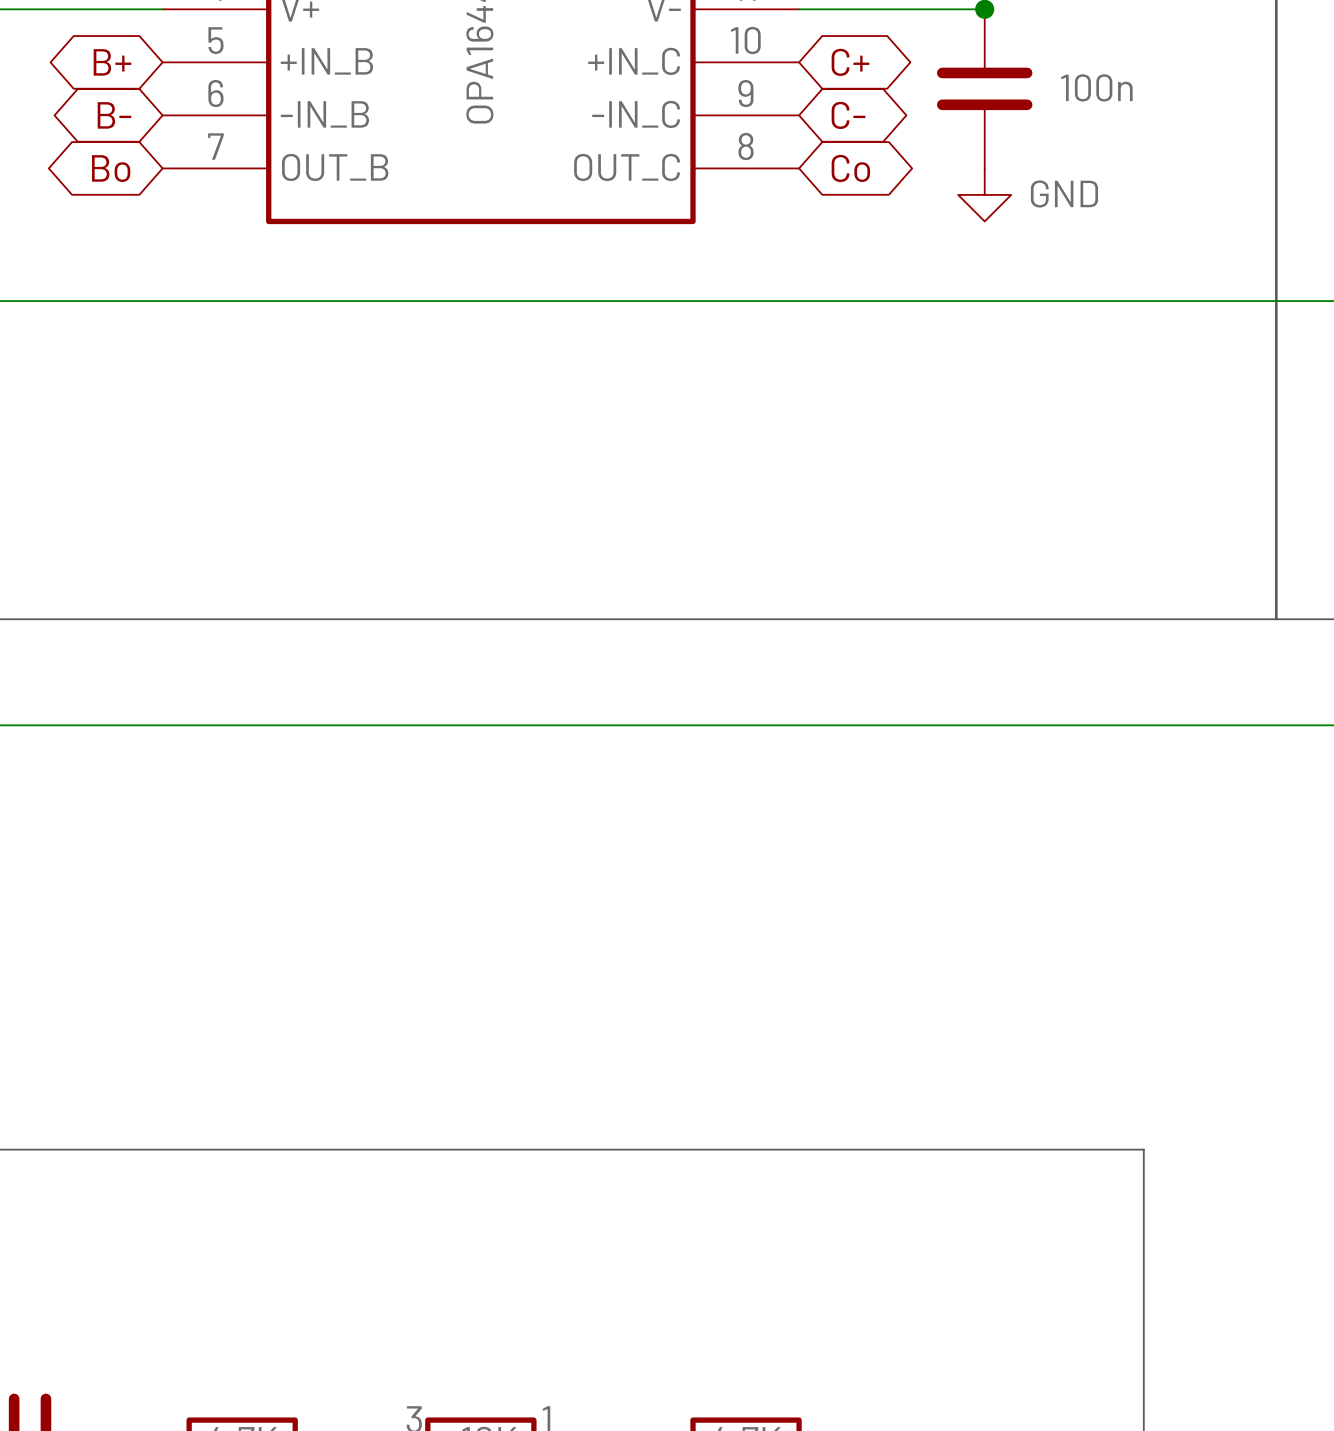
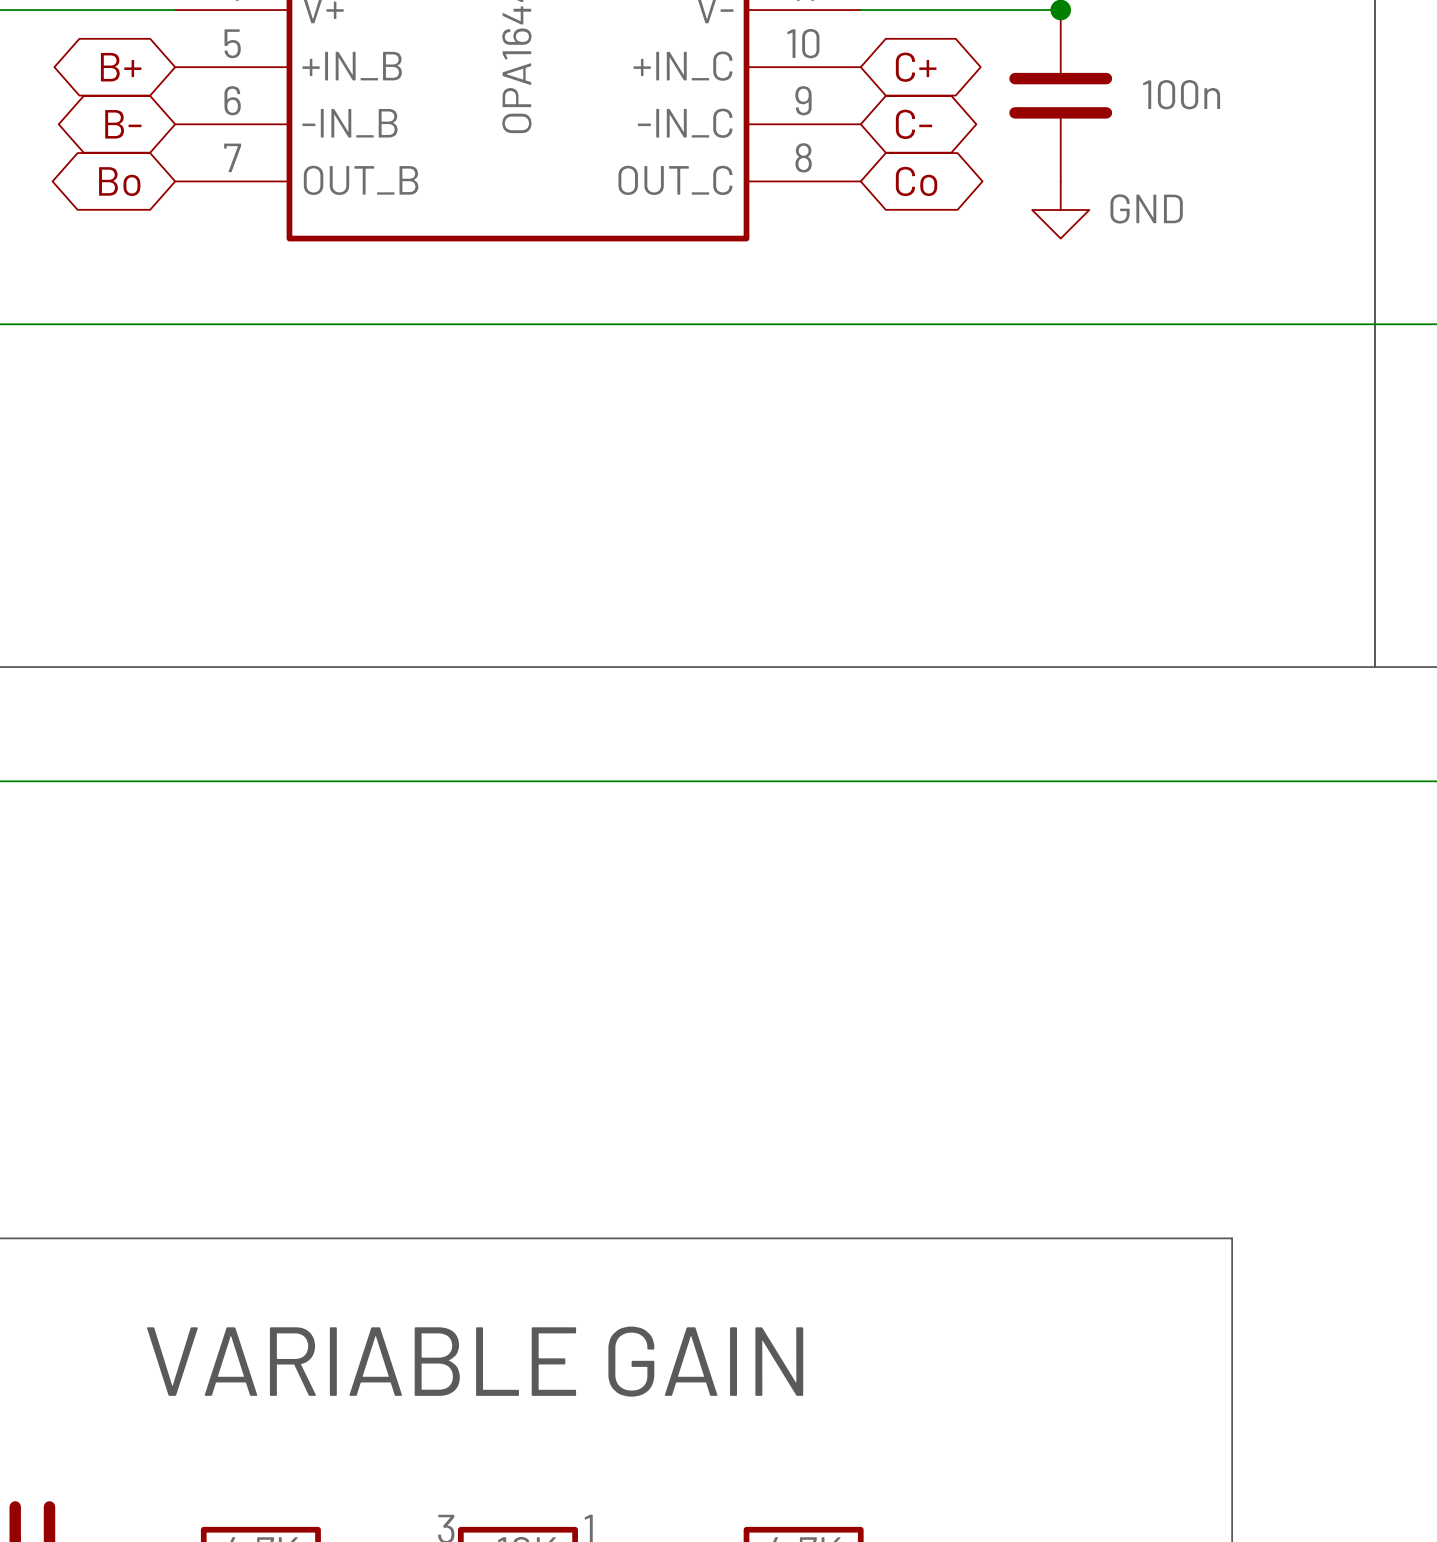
text: none -> VARIABLE GAIN (475, 1361)

